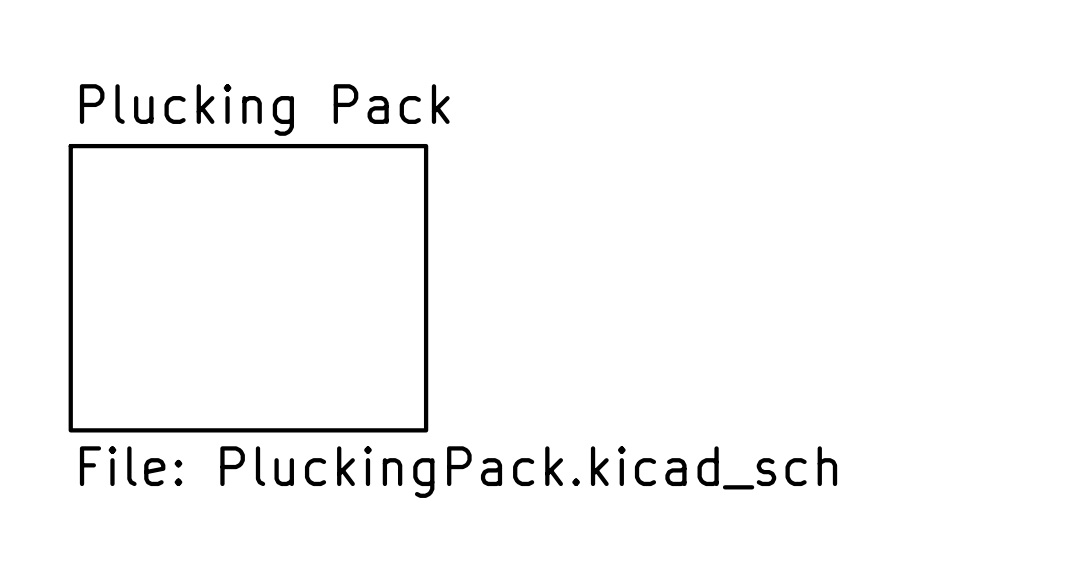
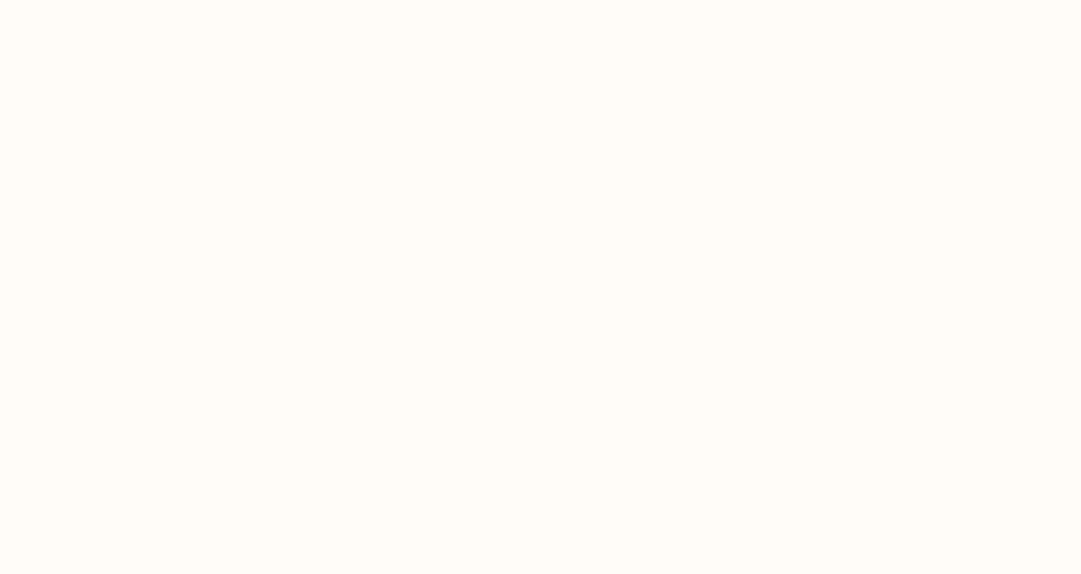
sheet Plucking Pack: File: PluckingPack.kicad_sch (248, 288) -> none

